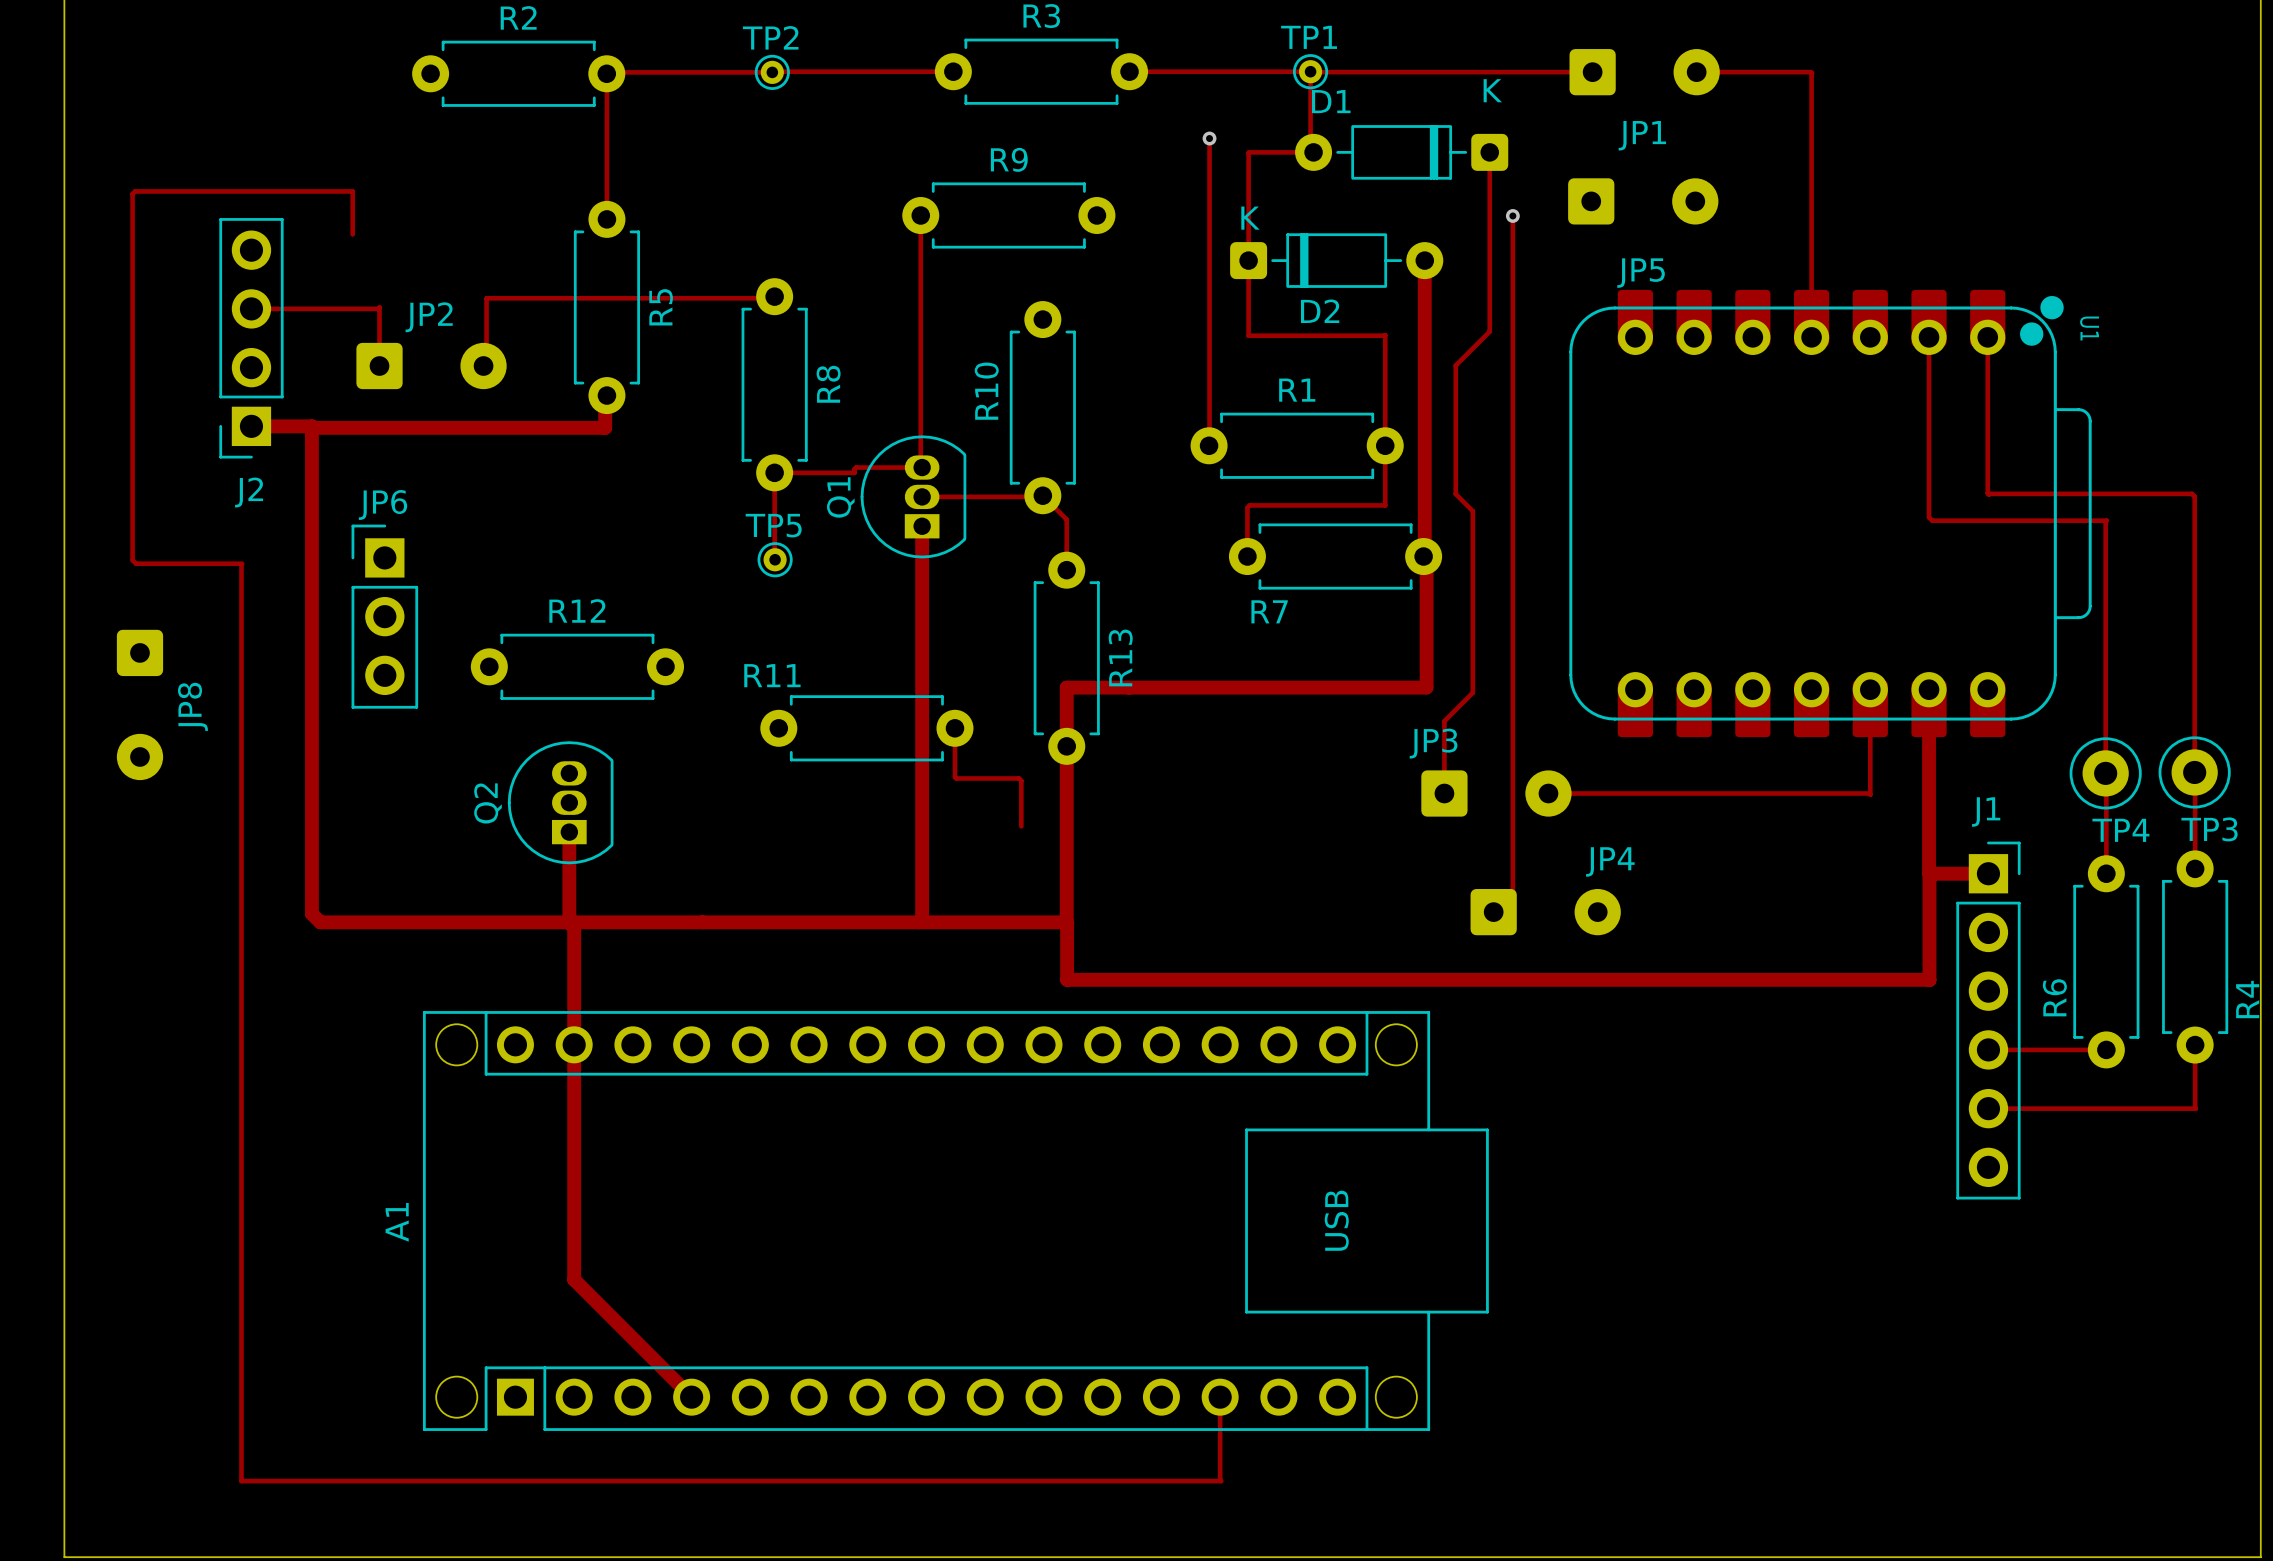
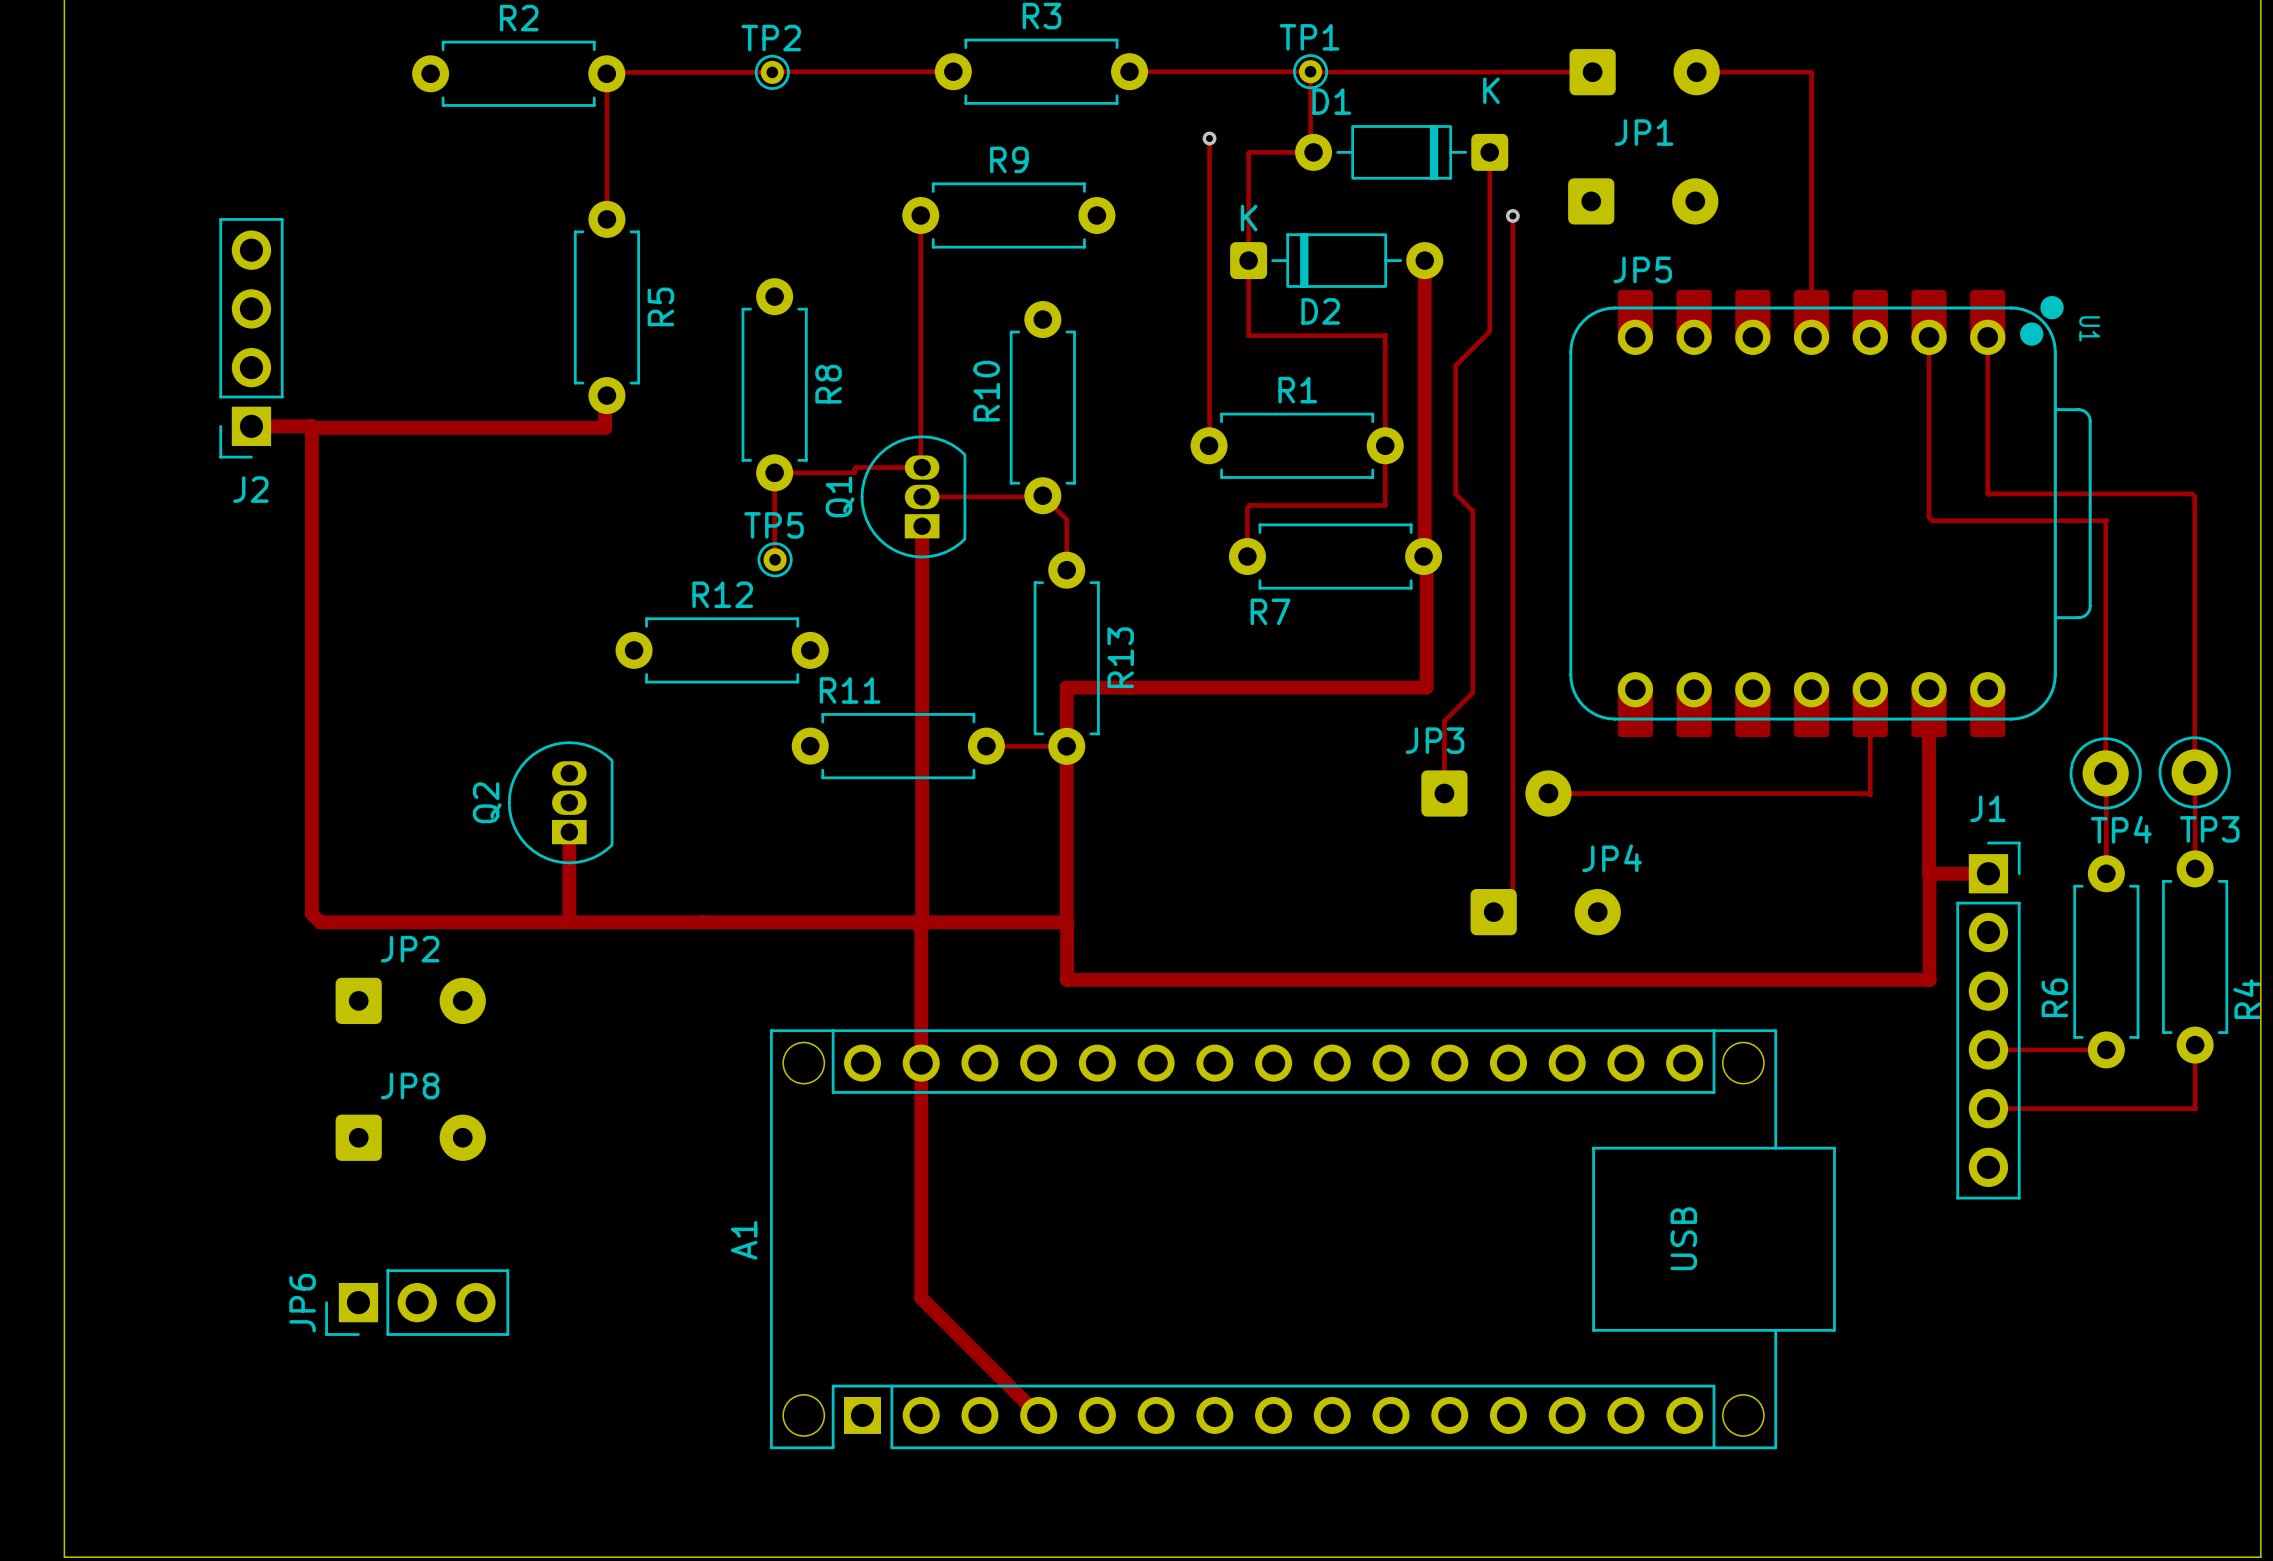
track: (352, 191) (135, 191) (132, 194) (132, 560) (136, 563) (242, 563) -> none
track: (352, 191) (352, 234) -> none
track: (772, 298) (486, 298) (486, 367) -> none
track: (251, 308) (379, 307) (379, 366) -> none
JP2 position: (431, 366) -> (410, 1000)
track: (241, 566) (241, 1481) (1221, 1481) (1220, 1397) -> none
JP6 rotation: 0° (384, 616) -> 90° counterclockwise (417, 1302)
JP6 position: (384, 616) -> (417, 1302)
R12 position: (577, 666) -> (722, 650)
R11 name position: R11 (772, 675) -> R11 (850, 690)
JP8 rotation: 0° (139, 704) -> 90° counterclockwise (410, 1137)
JP8 position: (139, 704) -> (410, 1137)
R11 position: (866, 728) -> (898, 746)
track: (954, 728) (954, 777) (1019, 778) (1021, 780) (1021, 826) -> none
track: none -> (986, 746) (1066, 746)
track: (568, 922) (574, 927) (574, 1279) (691, 1397) -> none
track: none -> (915, 922) (921, 928) (921, 1297) (1038, 1415)
A1 position: (955, 1221) -> (1302, 1239)

